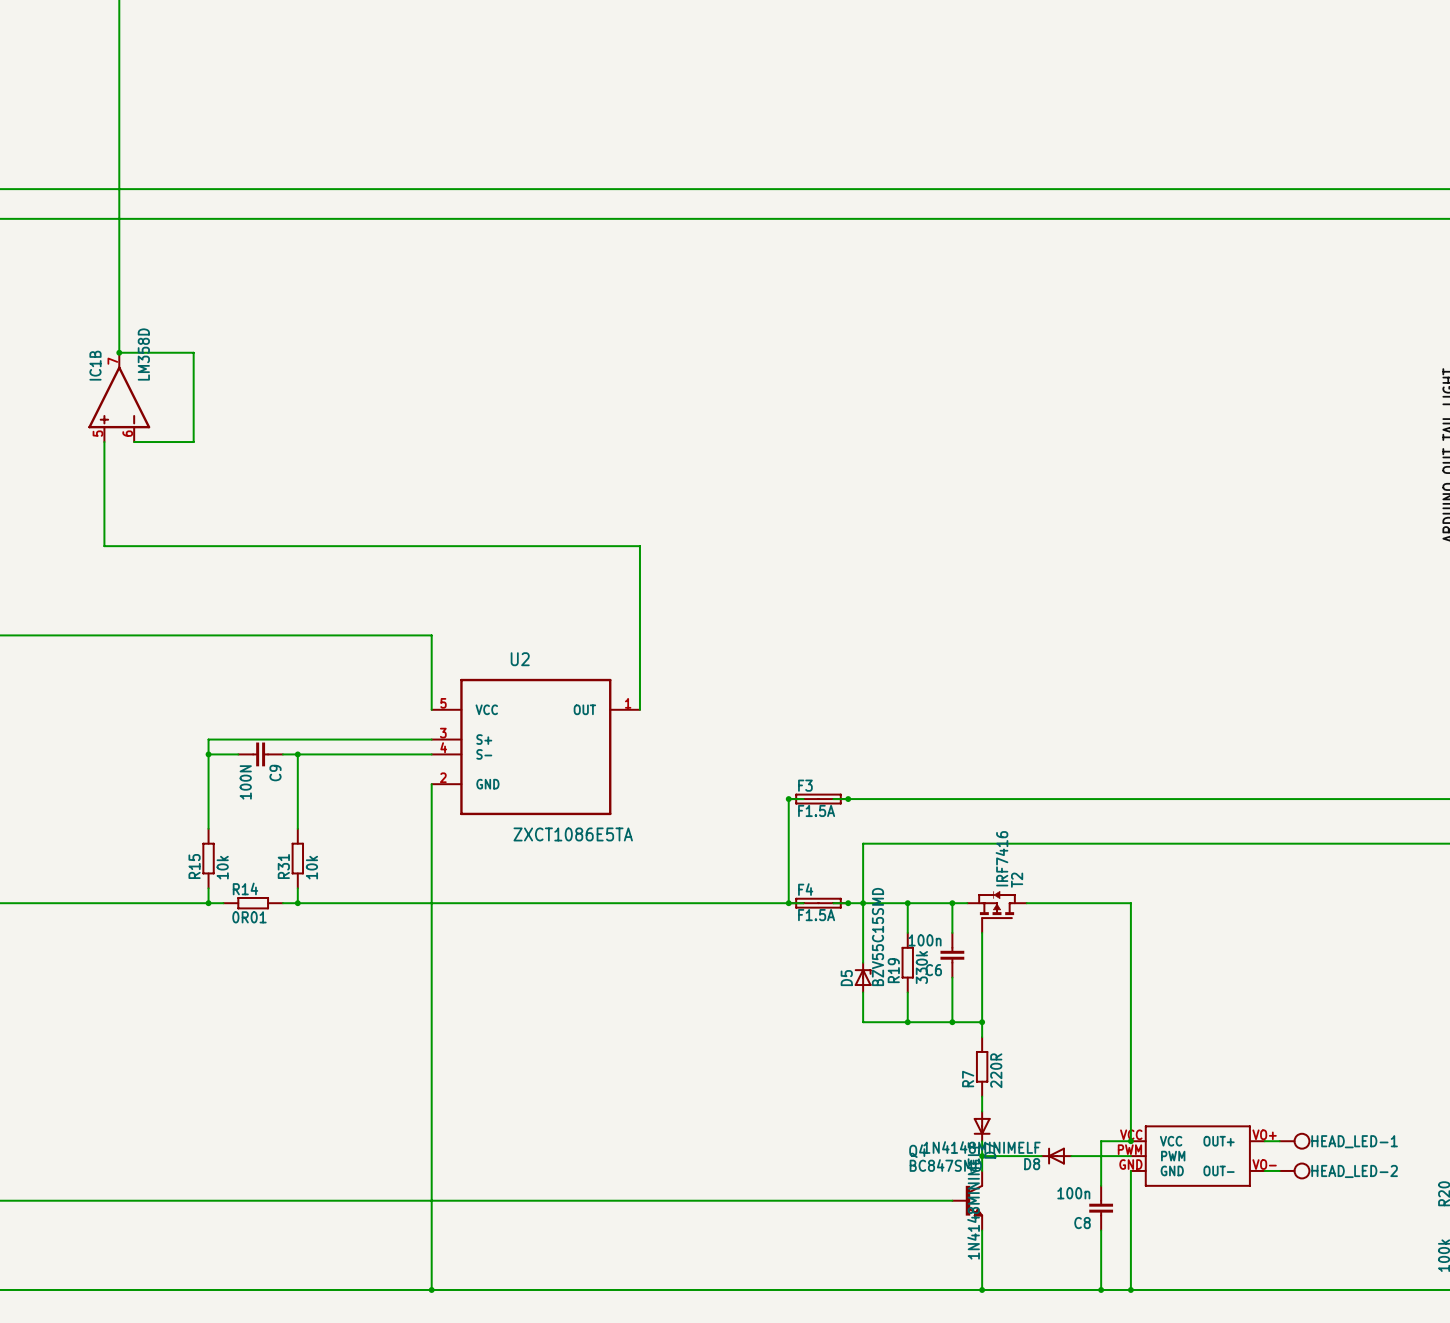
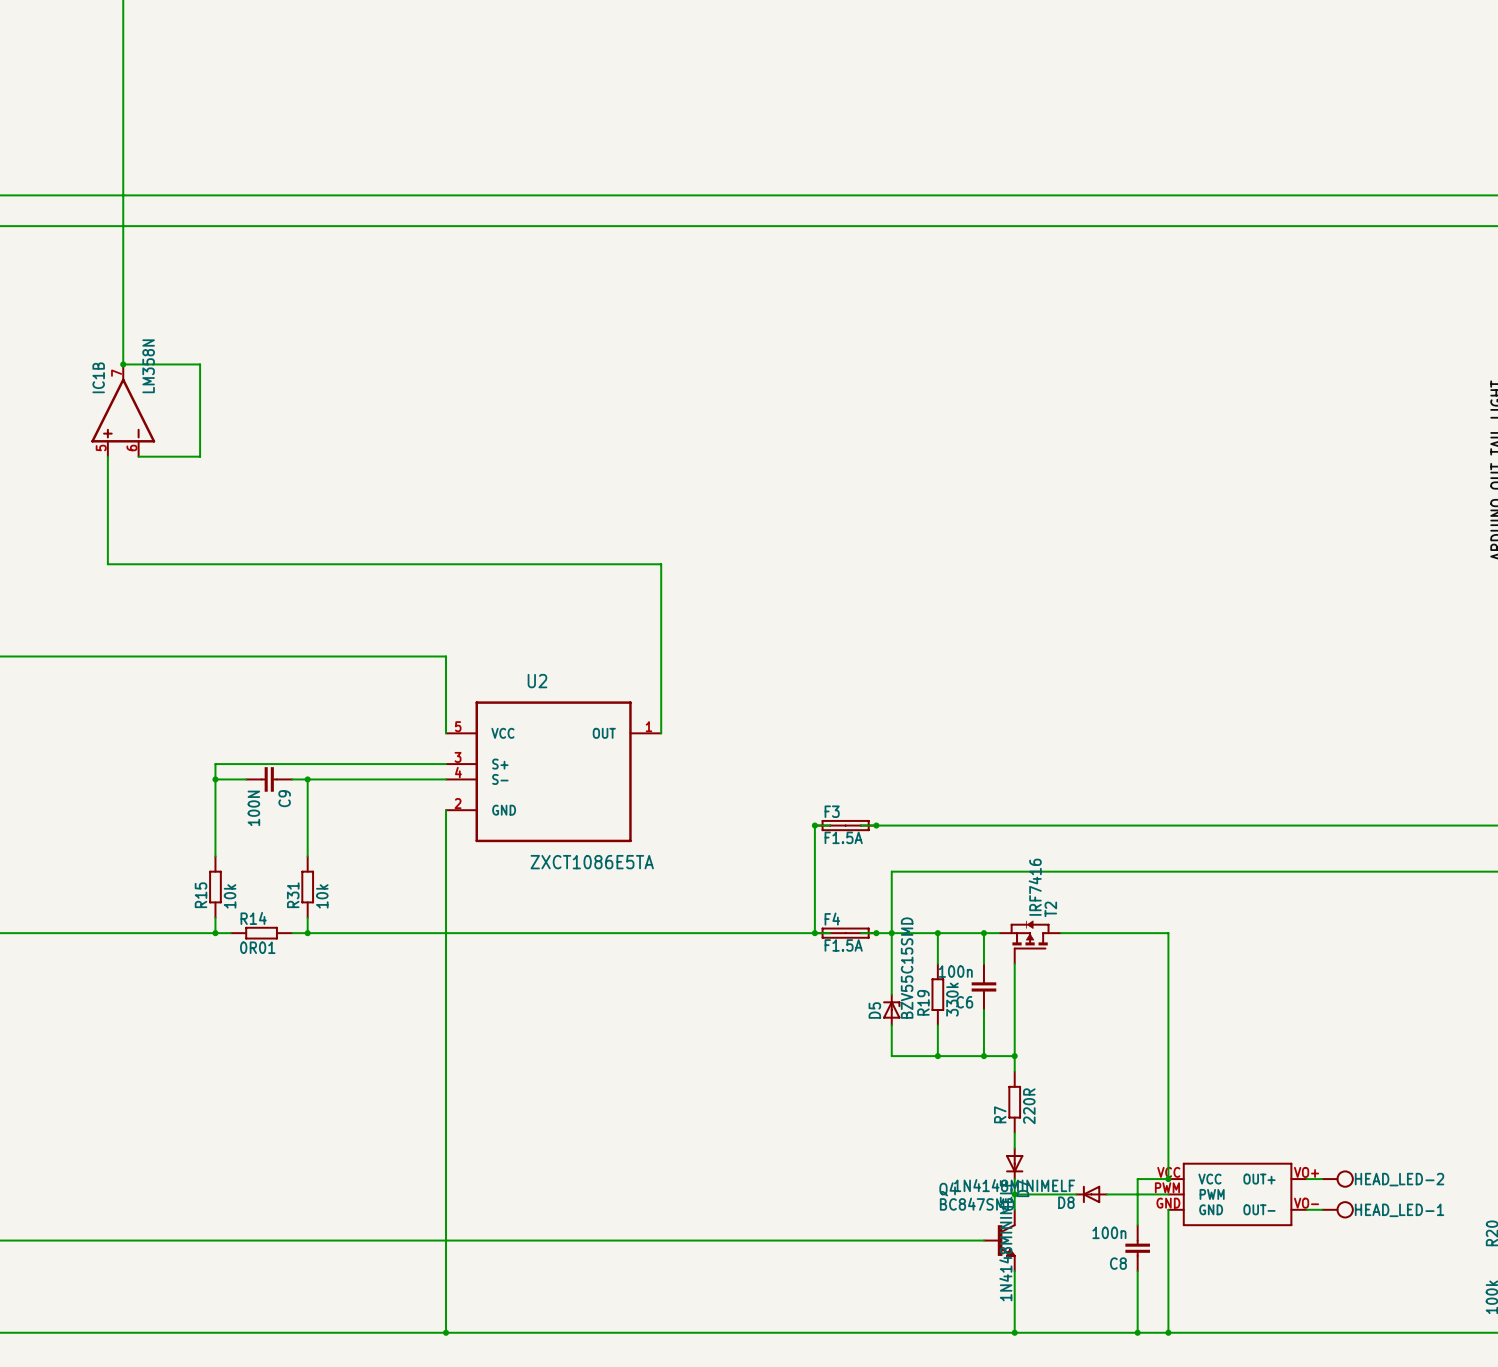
IC1B value: LM358D (143, 354) -> LM358N (148, 366)
HEAD_LED-1 name: HEAD_LED-1 (1354, 1141) -> HEAD_LED-2 (1399, 1179)
HEAD_LED-2 name: HEAD_LED-2 (1354, 1171) -> HEAD_LED-1 (1399, 1210)

